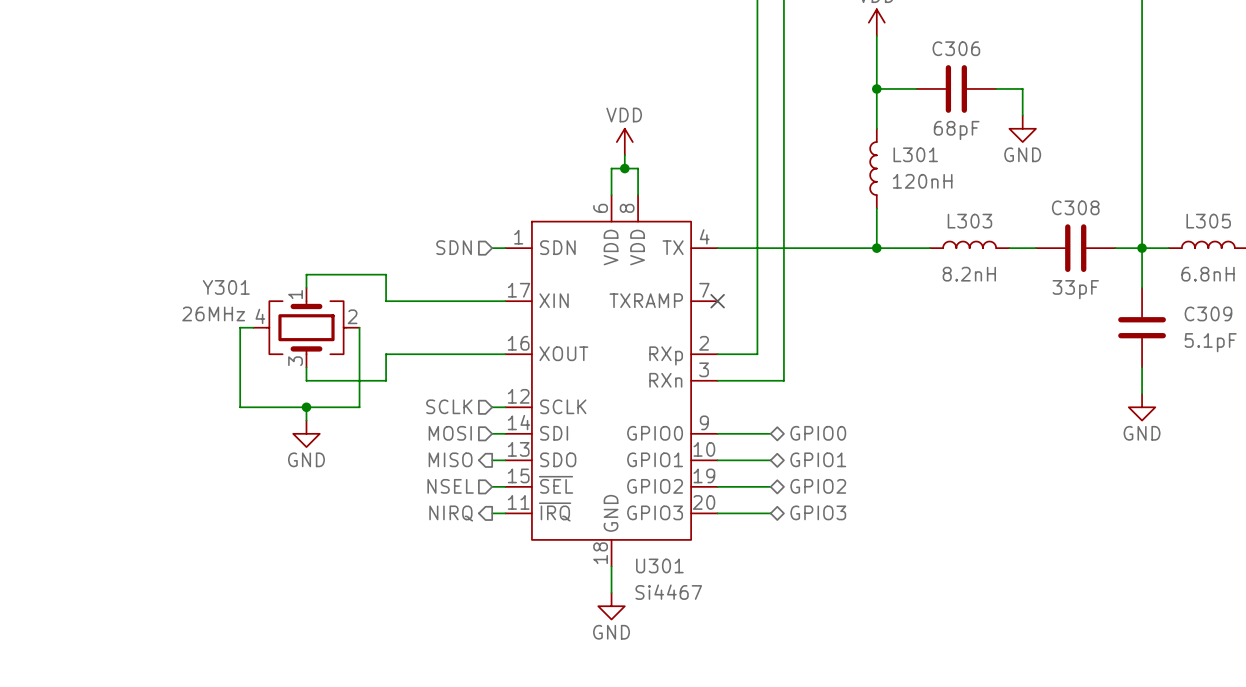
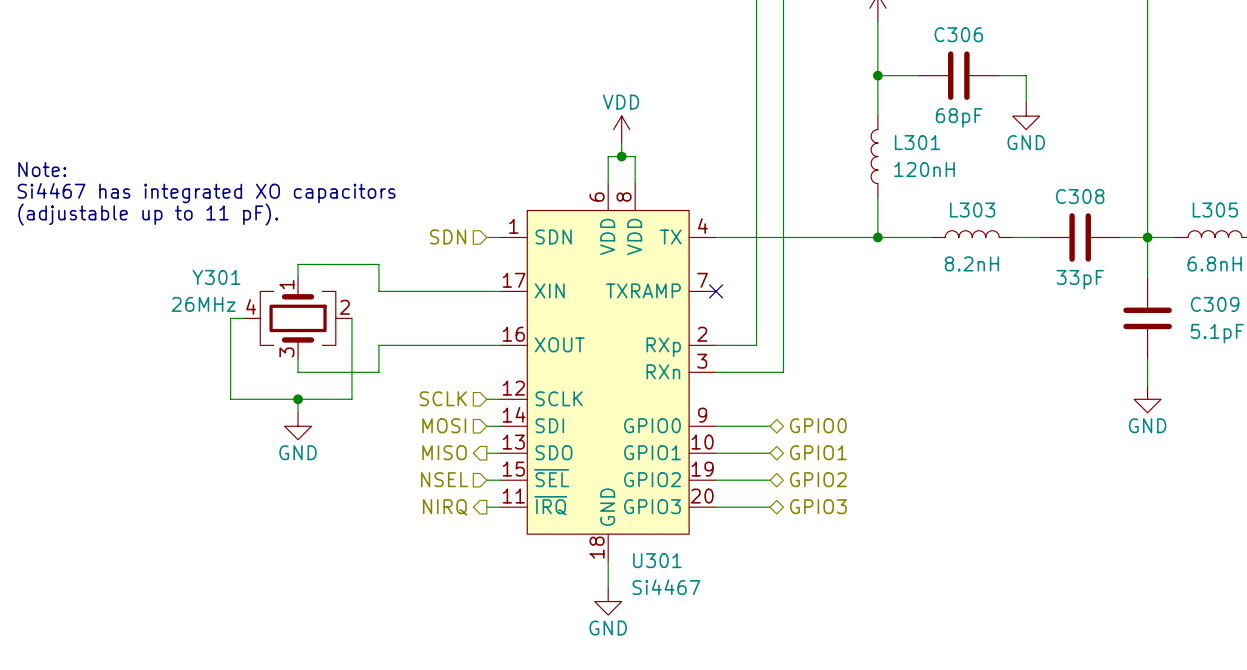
text: none -> Note: (42, 169)
text: none -> Si4467 has integrated XO capacitors (206, 193)
text: none -> (adjustable up to 11 pF). (148, 214)

